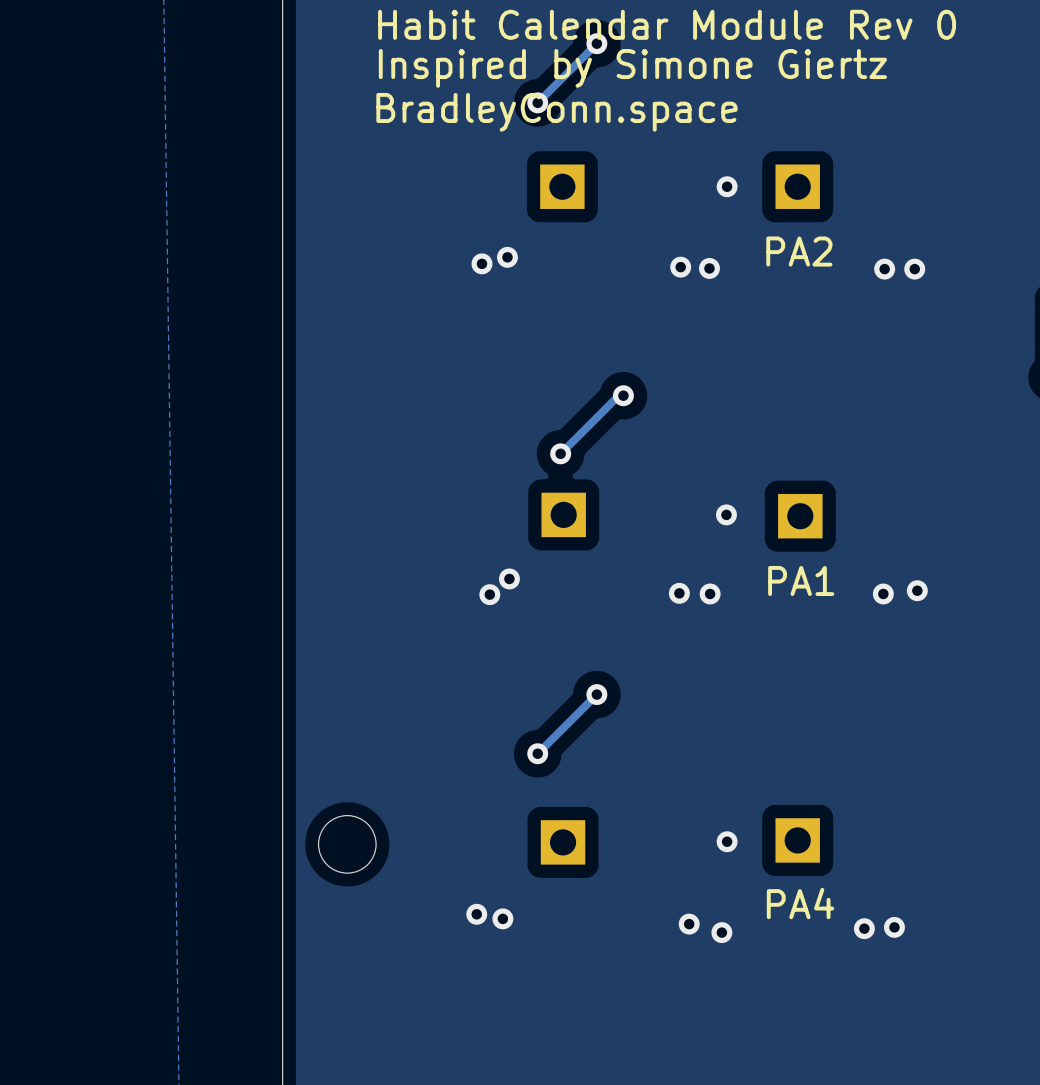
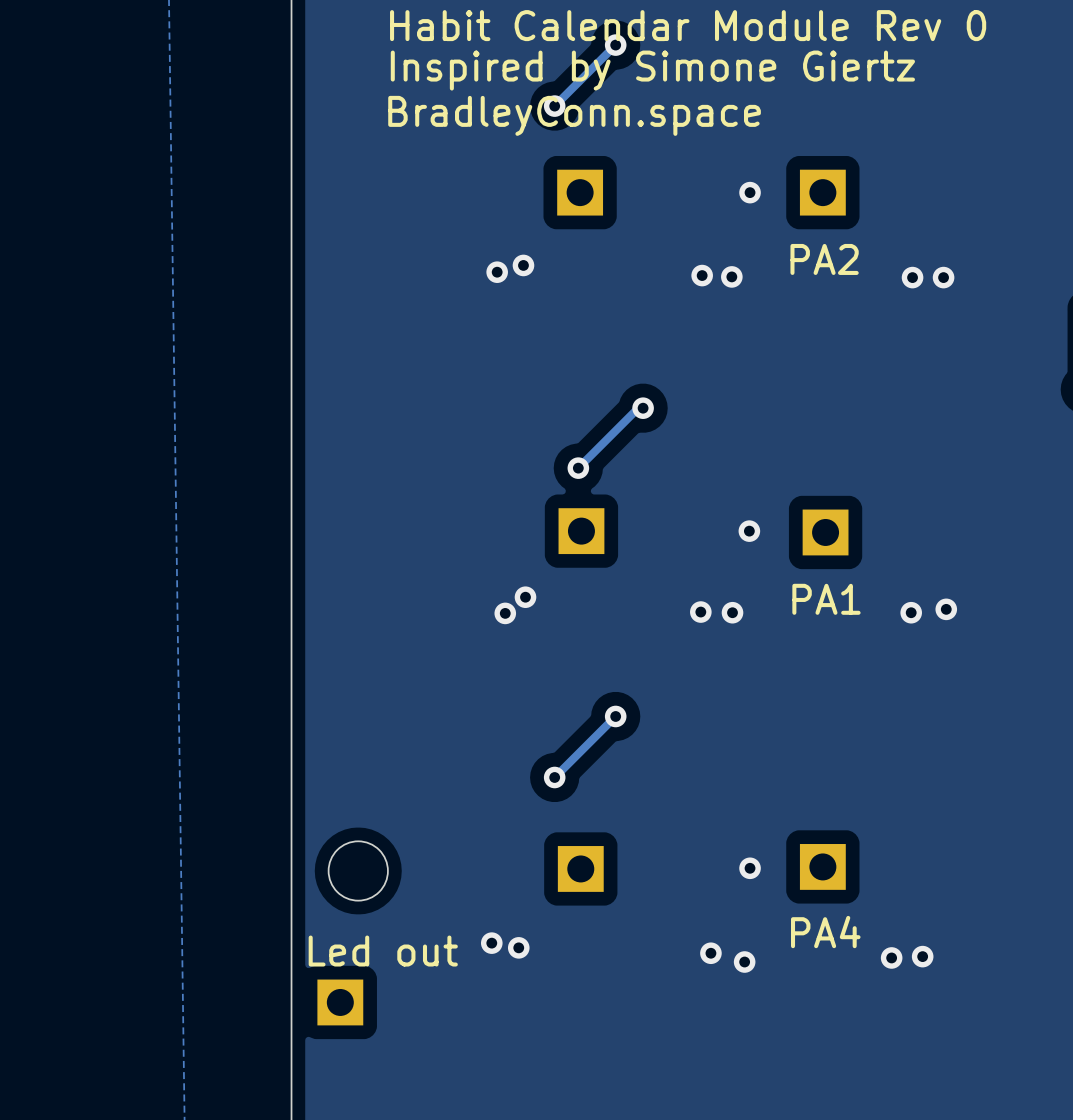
text: none -> Led out (383, 951)
part: none -> (340, 1002)

